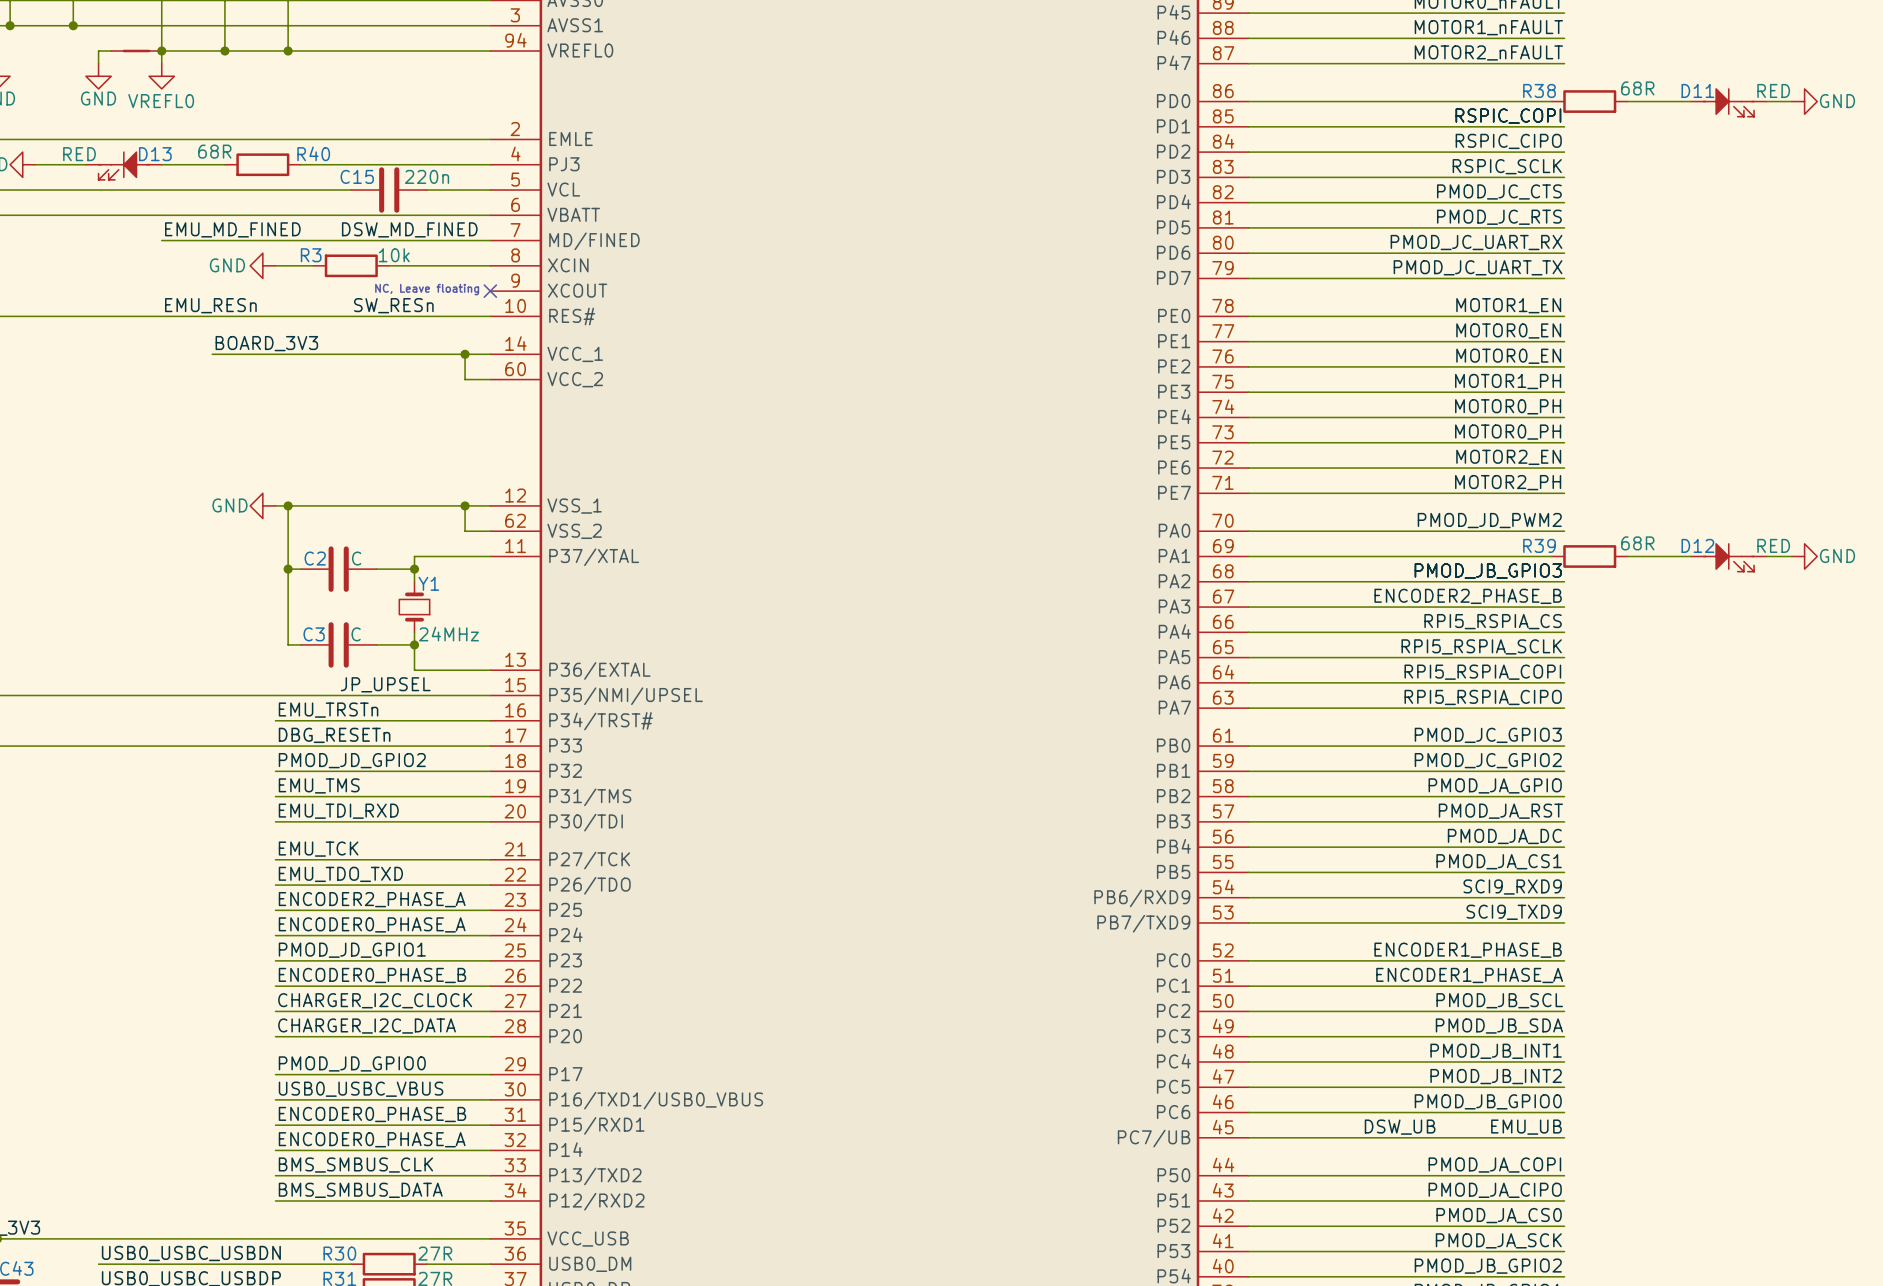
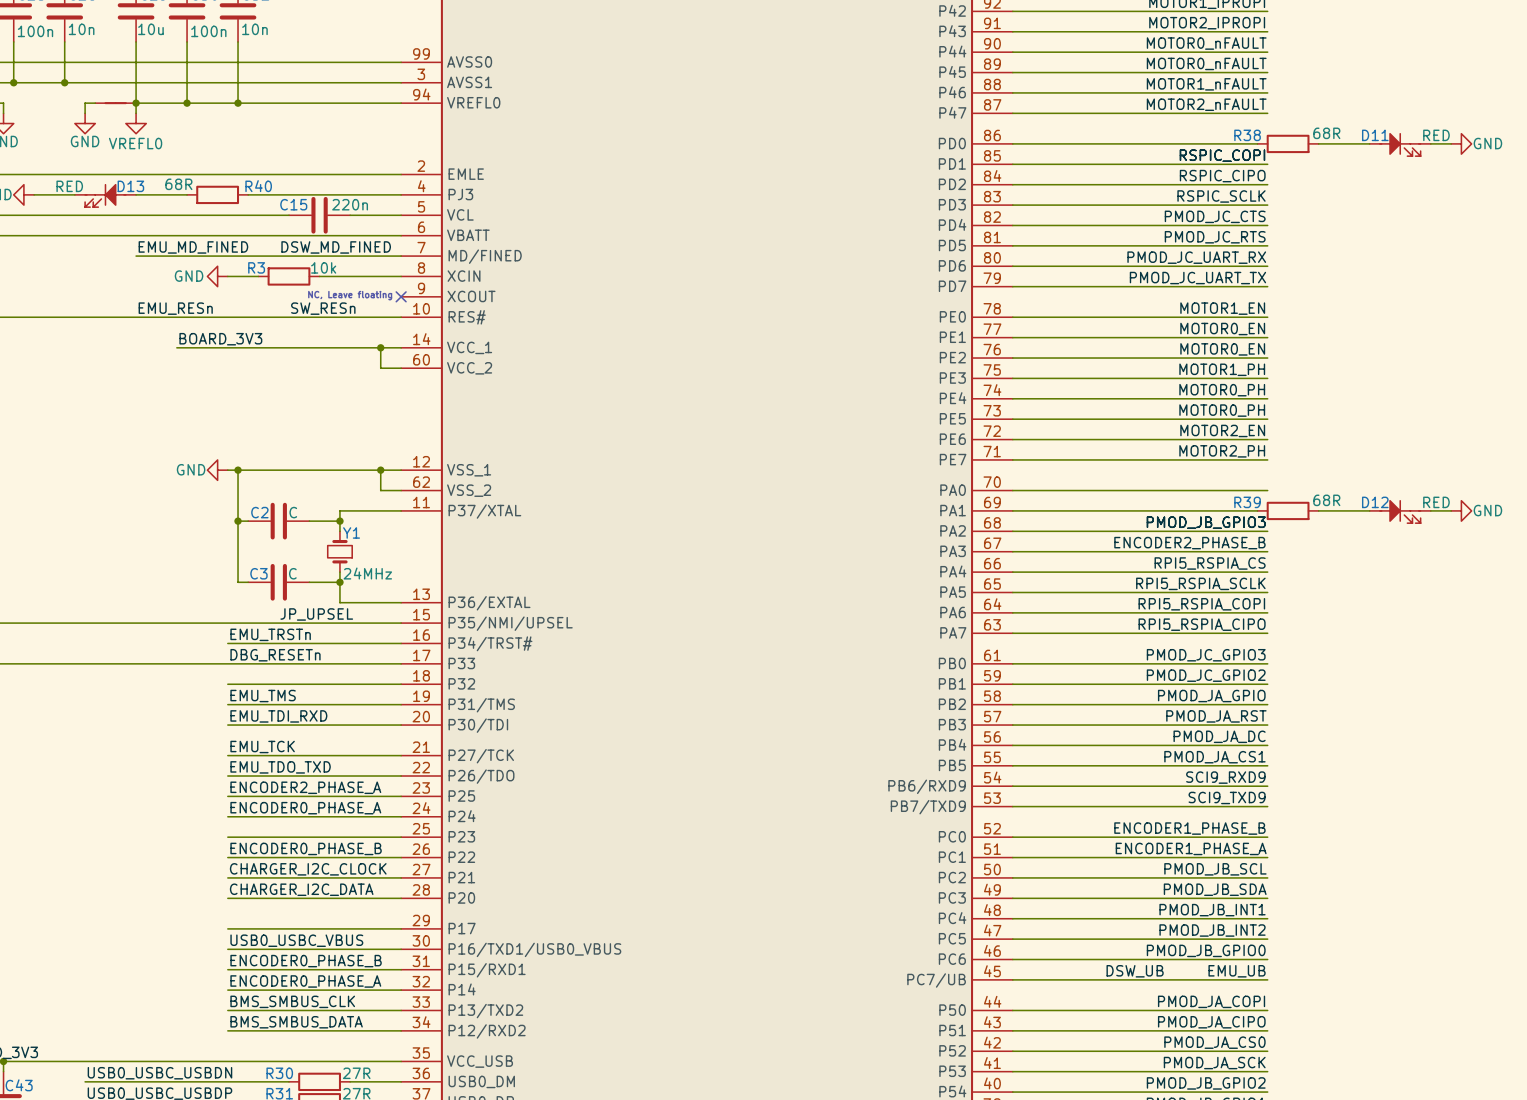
label: PMOD_JD_PWM2 (1489, 520) -> none
label: PMOD_JD_GPIO2 (352, 760) -> none
label: PMOD_JD_GPIO1 (352, 950) -> none
label: PMOD_JD_GPIO0 (352, 1063) -> none

